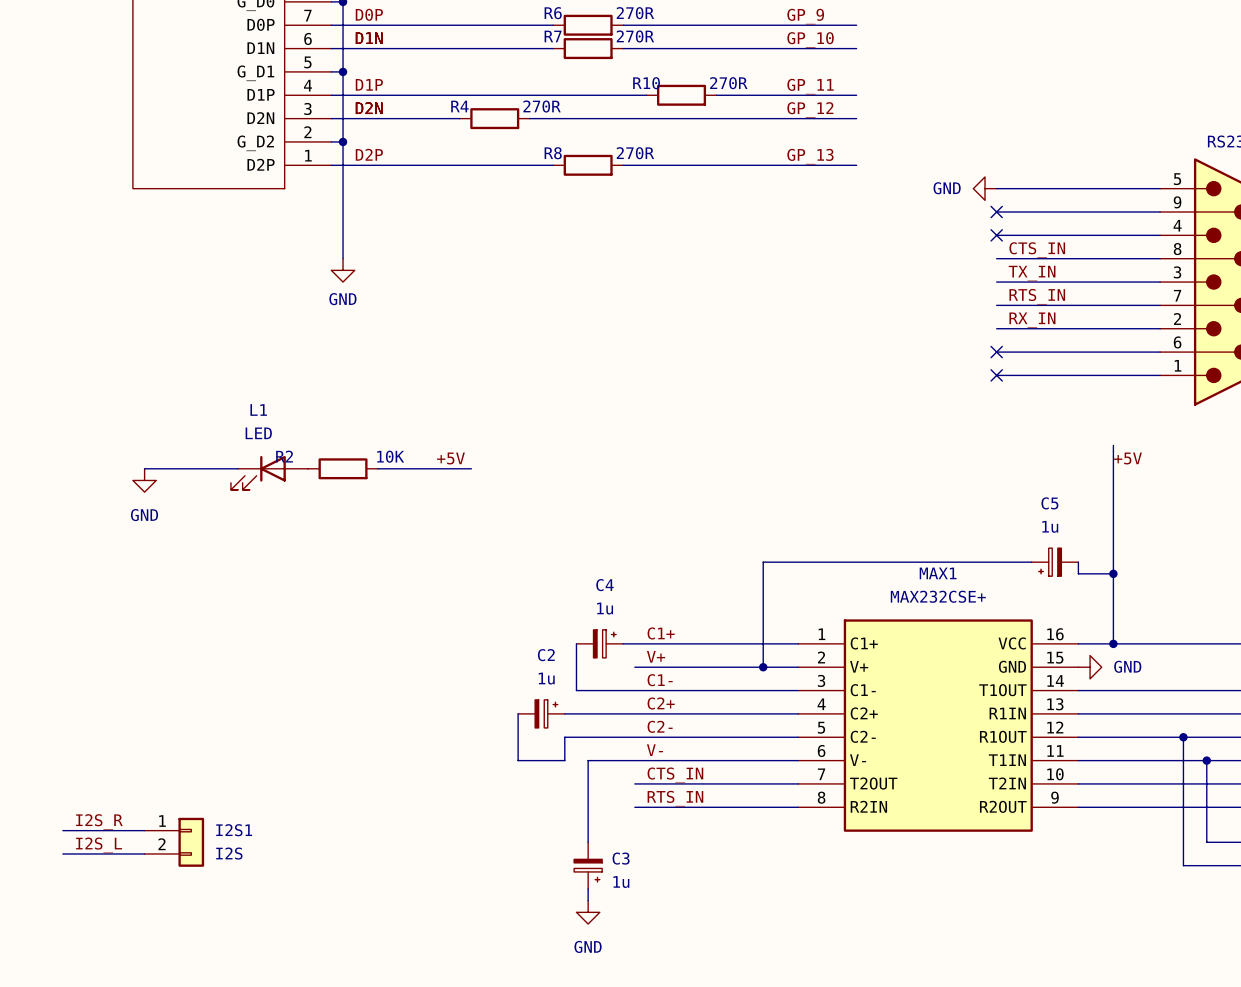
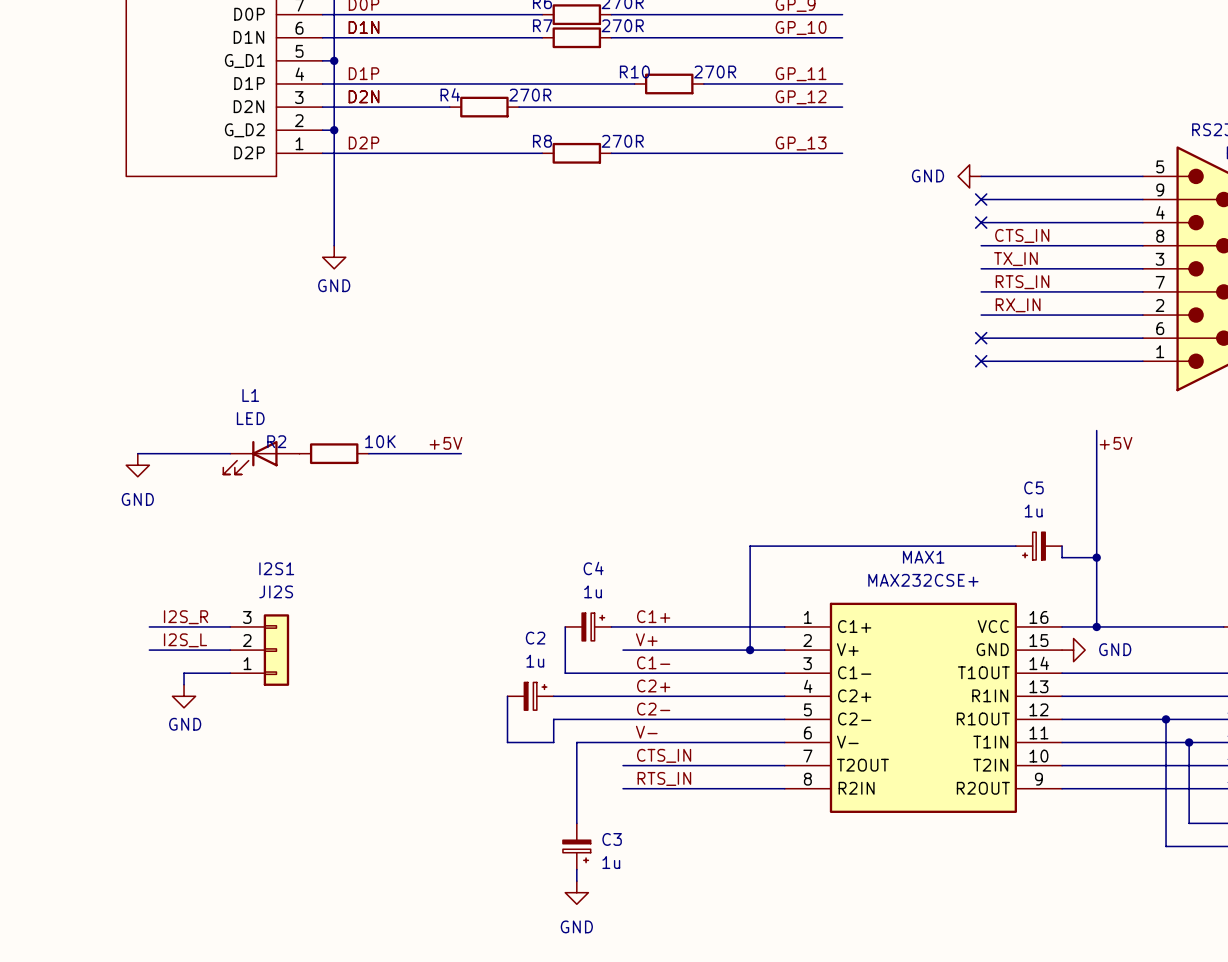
wire: none -> (149, 626) (230, 626)
wire: none -> (230, 673) (184, 673) (184, 684)
power symbol: none -> GND (184, 696)
I2S1 symbol: [144, 817, 205, 867] -> [230, 614, 290, 686]
label position: I2S_R (99, 822) -> I2S_R (186, 617)
wire: (62, 830) (144, 830) -> (149, 650) (230, 650)
I2S1 name position: I2S1 (234, 830) -> I2S1 (276, 568)
label position: I2S_L (99, 845) -> I2S_L (185, 640)
wire: (62, 853) (144, 853) -> none
I2S1 value: I2S (229, 853) -> JI2S (276, 591)

